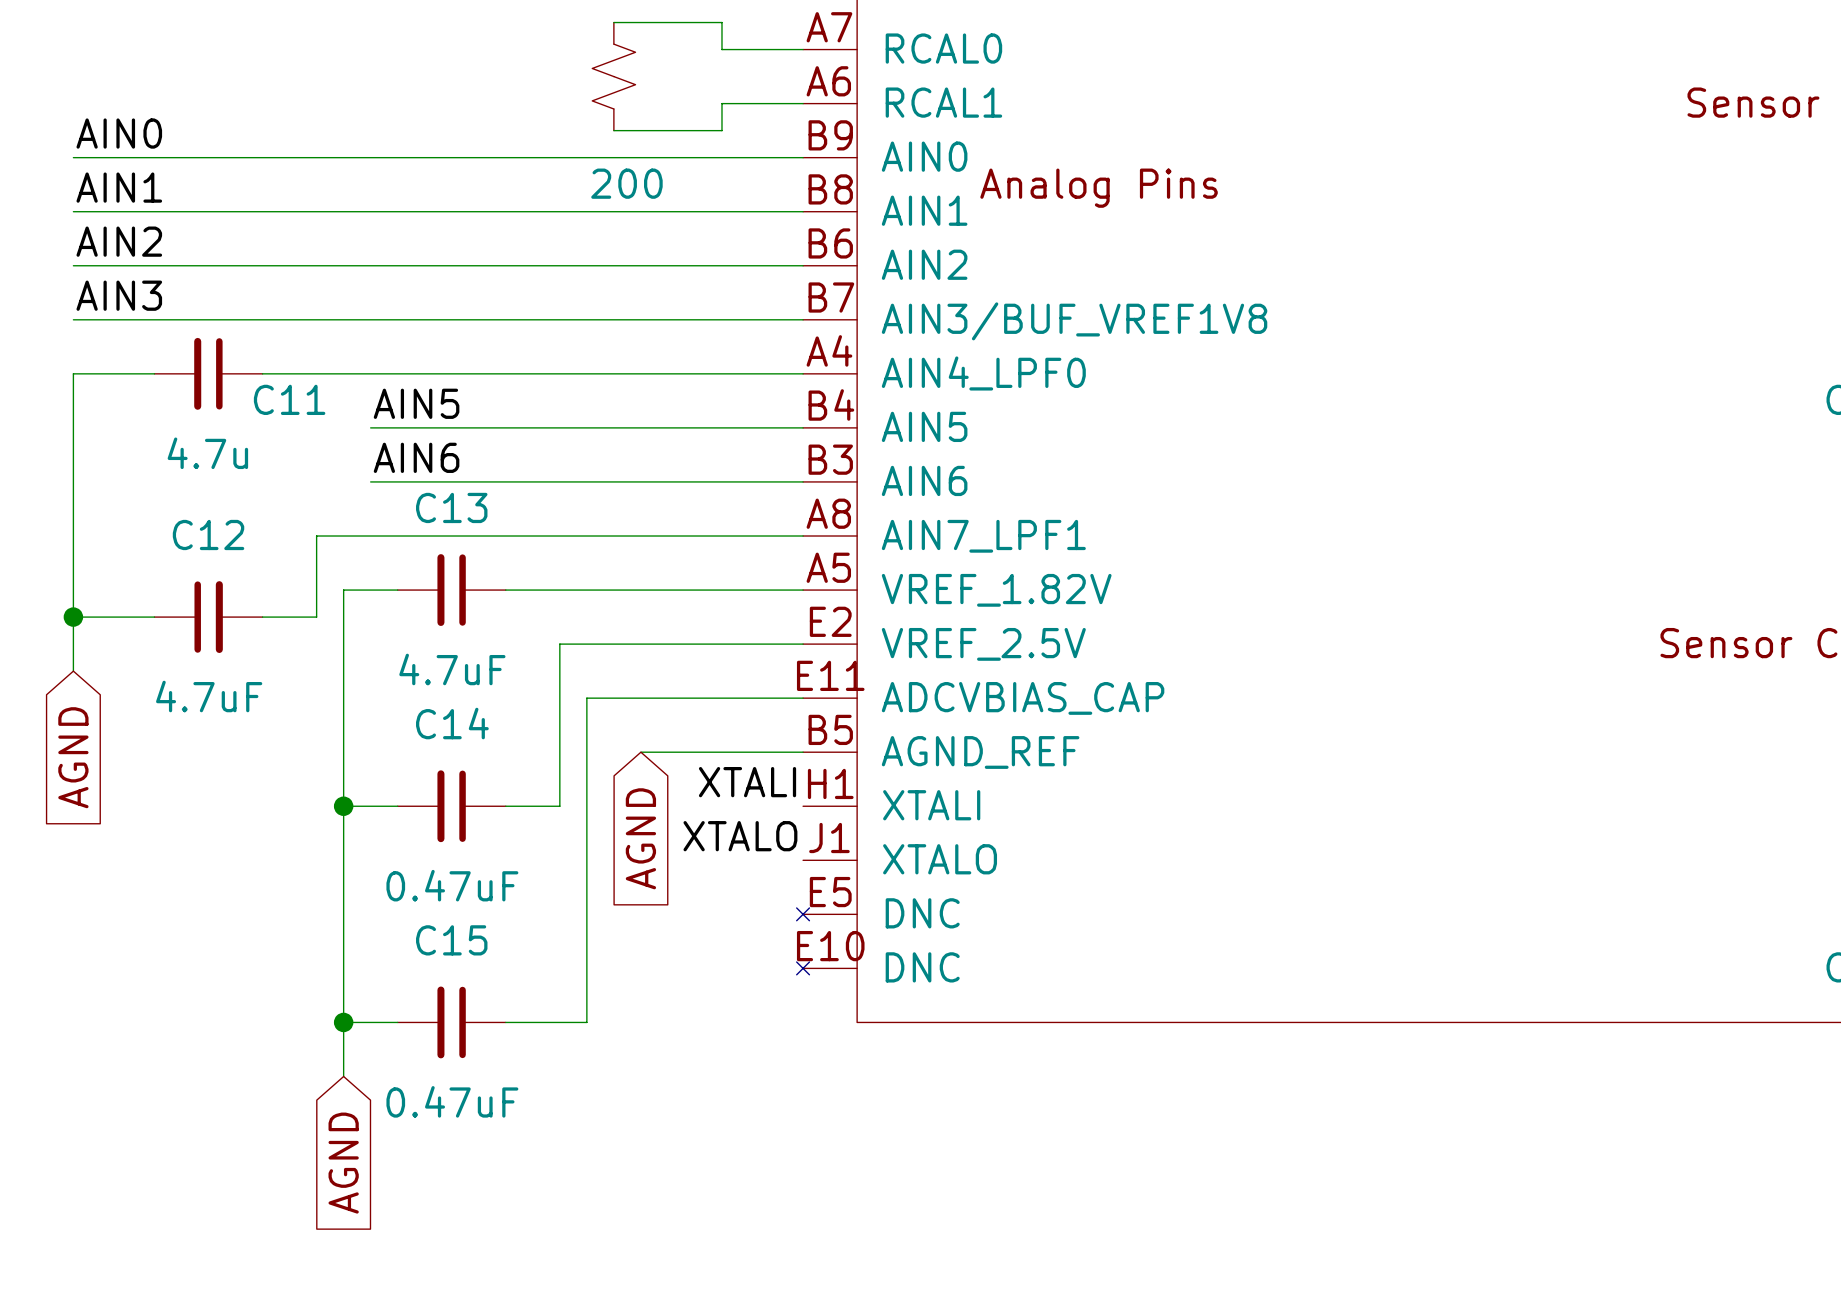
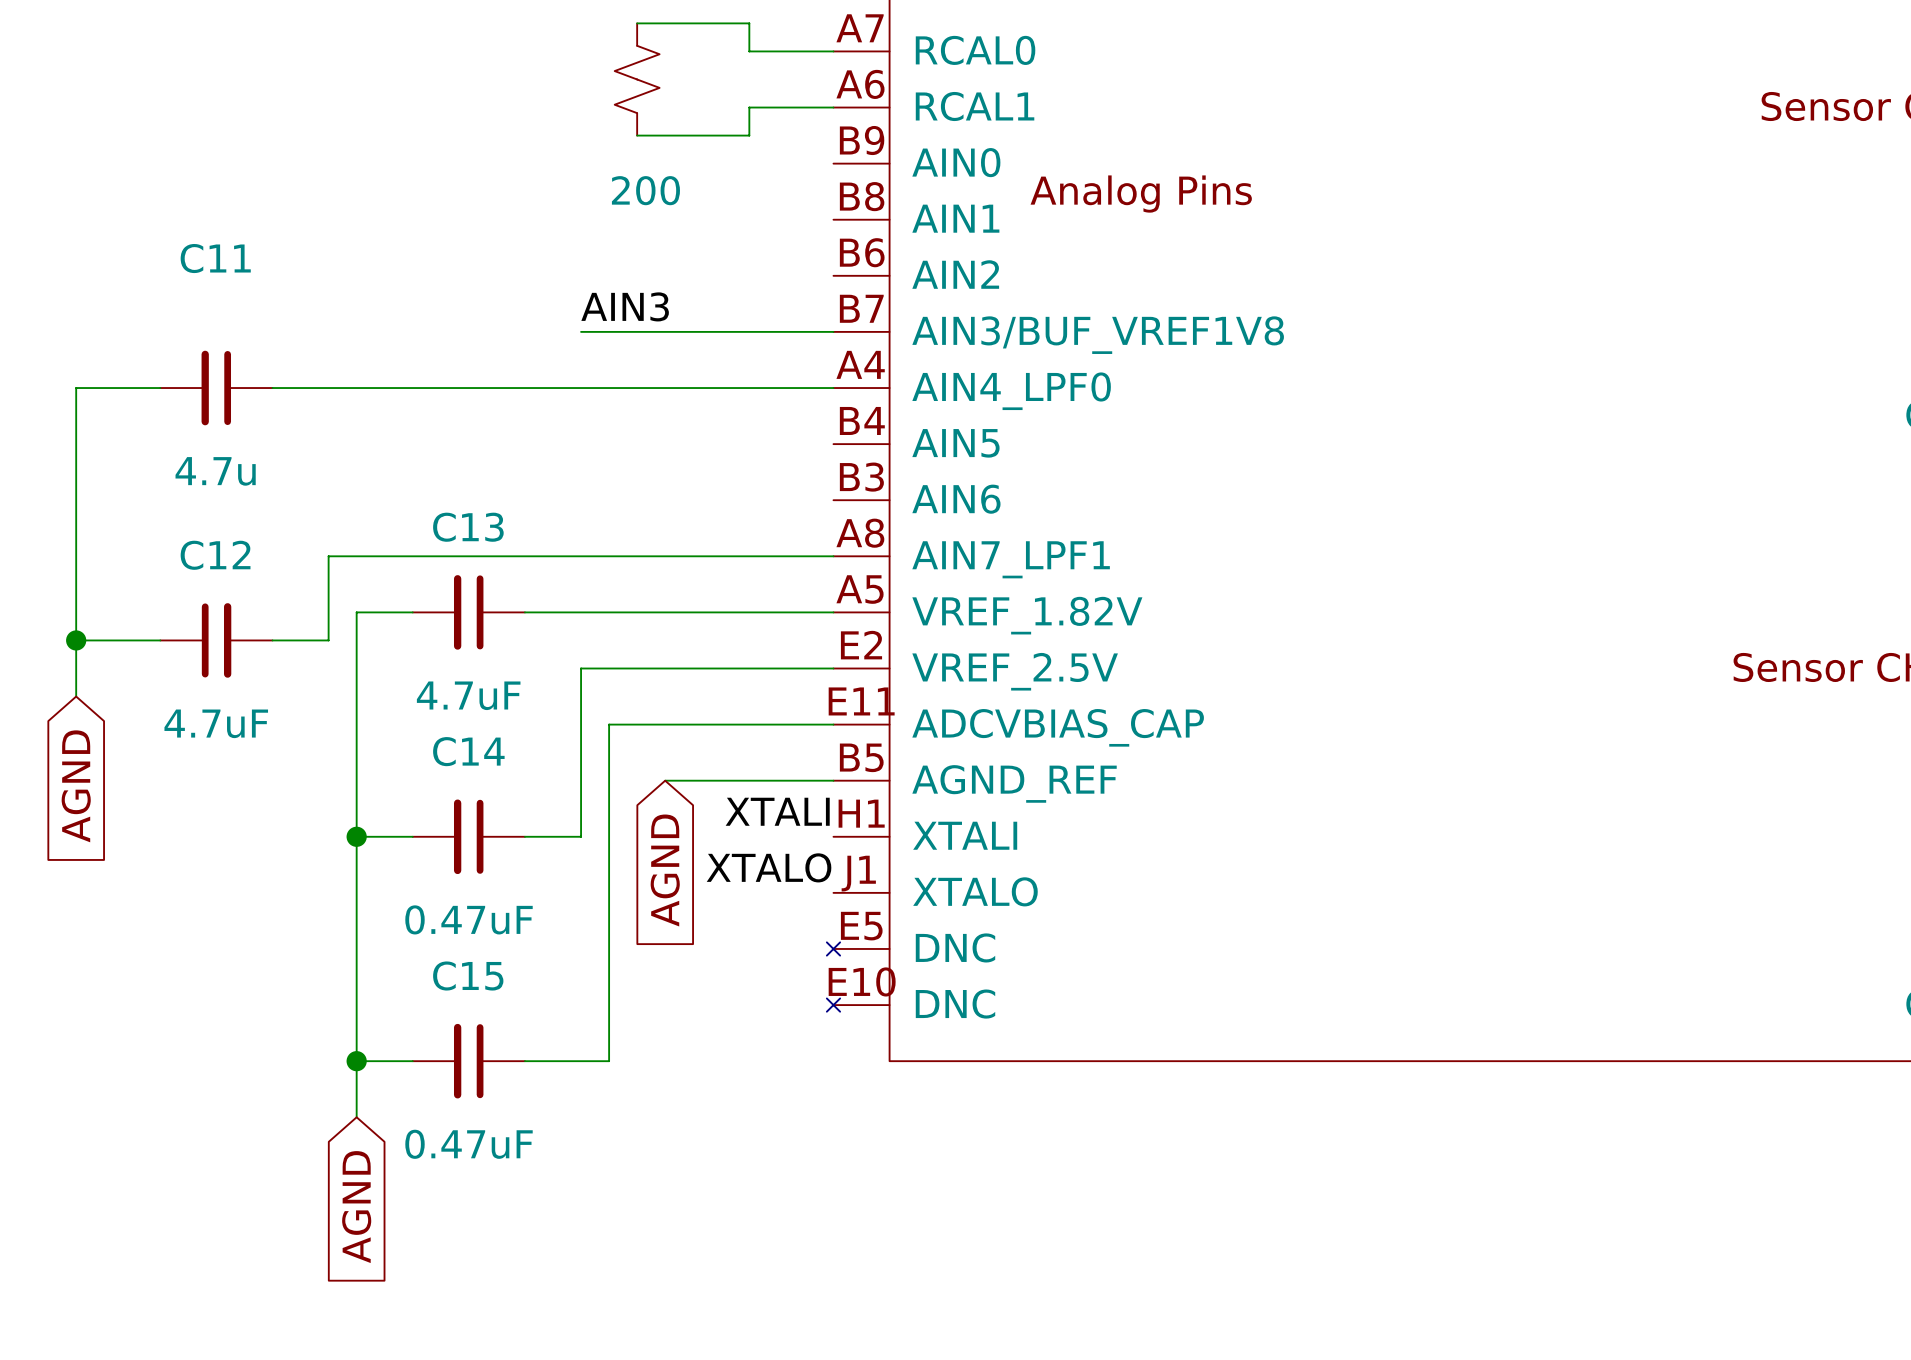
label: AIN0 (119, 133) -> none
wire: (73, 157) (803, 157) -> none
label: AIN1 (119, 187) -> none
wire: (73, 211) (803, 211) -> none
label: AIN2 (119, 241) -> none
wire: (73, 265) (803, 265) -> none
label position: AIN3 (119, 295) -> AIN3 (625, 306)
wire: (73, 319) (559, 319) -> none
C11 name position: C11 (289, 399) -> C11 (215, 258)
label: AIN5 (416, 403) -> none
wire: (370, 427) (803, 427) -> none
label: AIN6 (416, 457) -> none
wire: (370, 481) (803, 481) -> none

